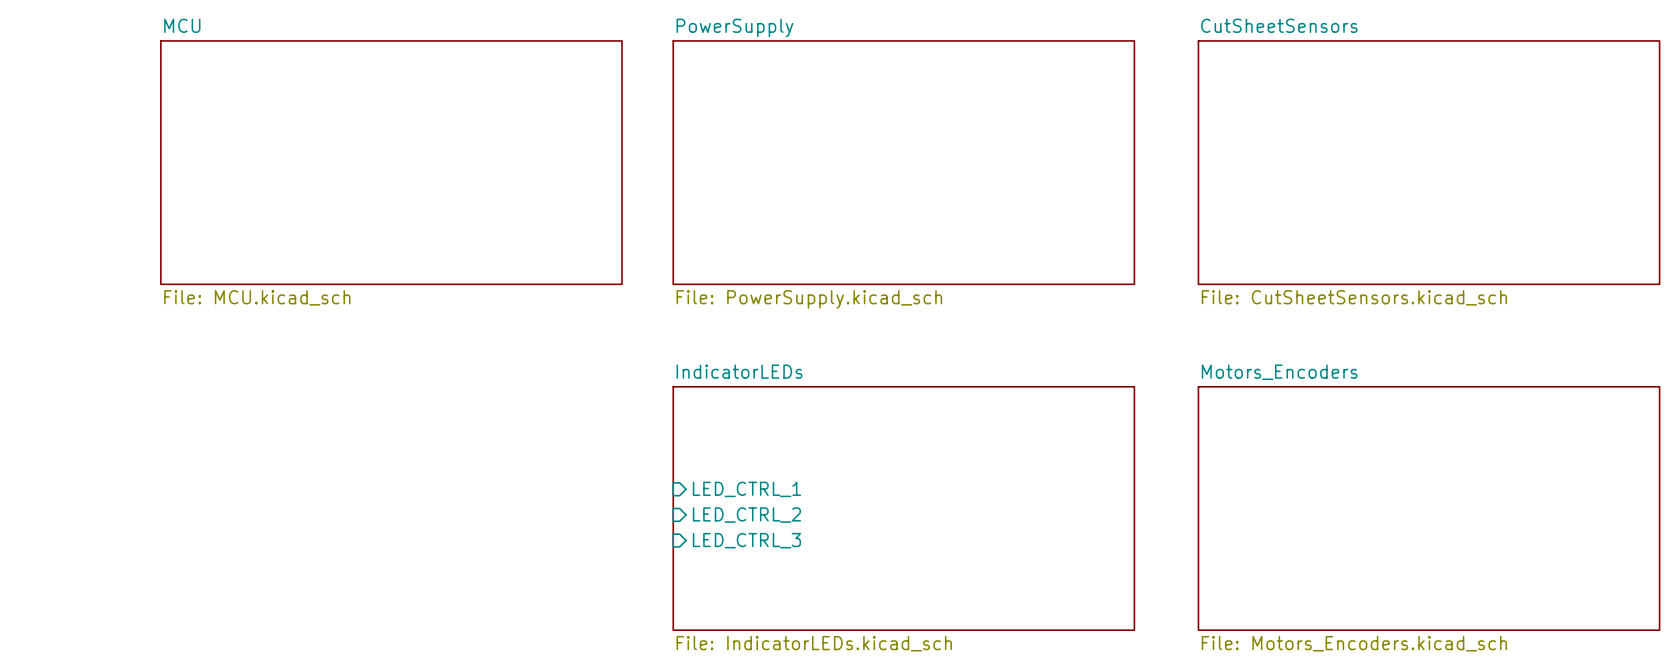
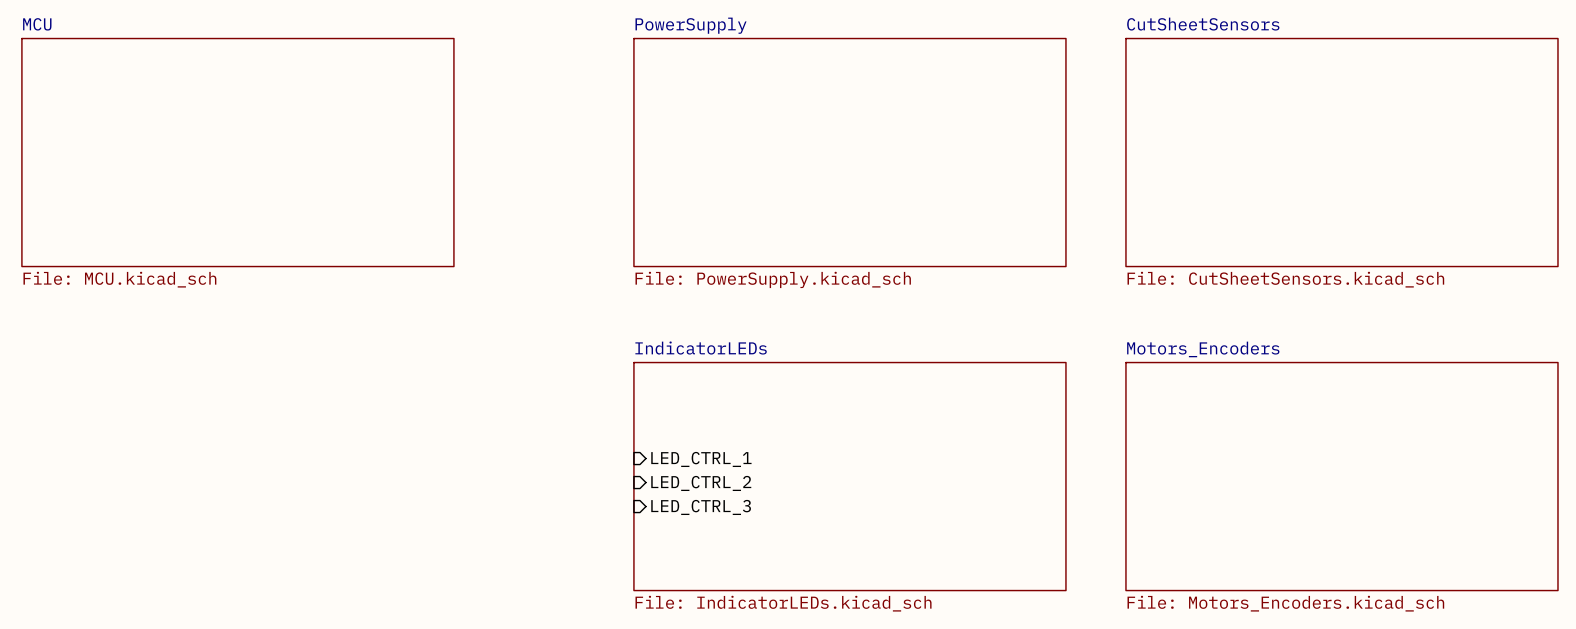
sheet MCU position: (391, 162) -> (237, 152)

